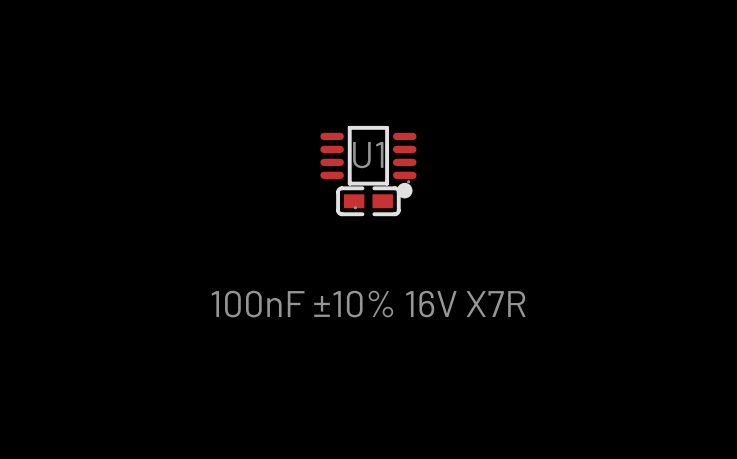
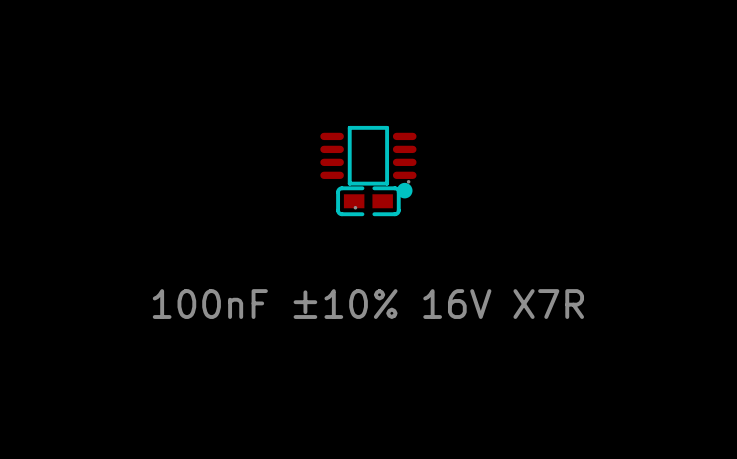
U1 name: U1 (368, 155) -> none

